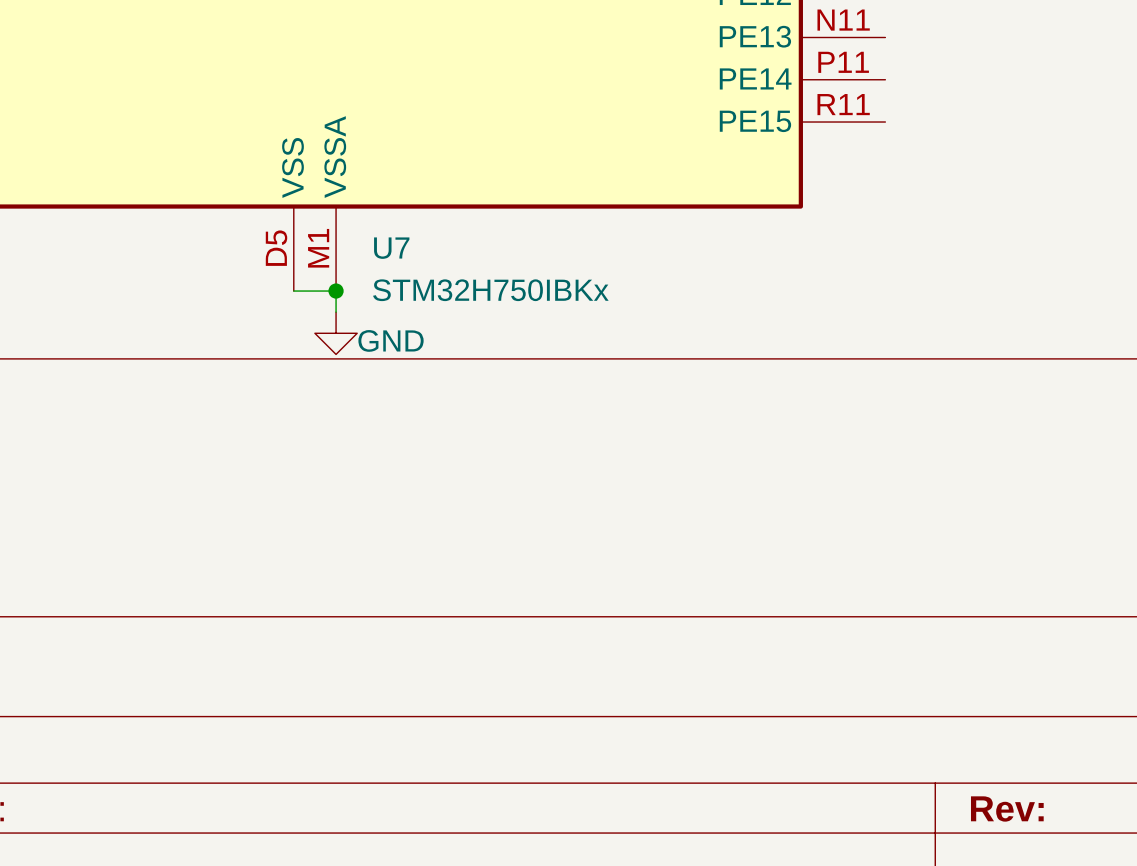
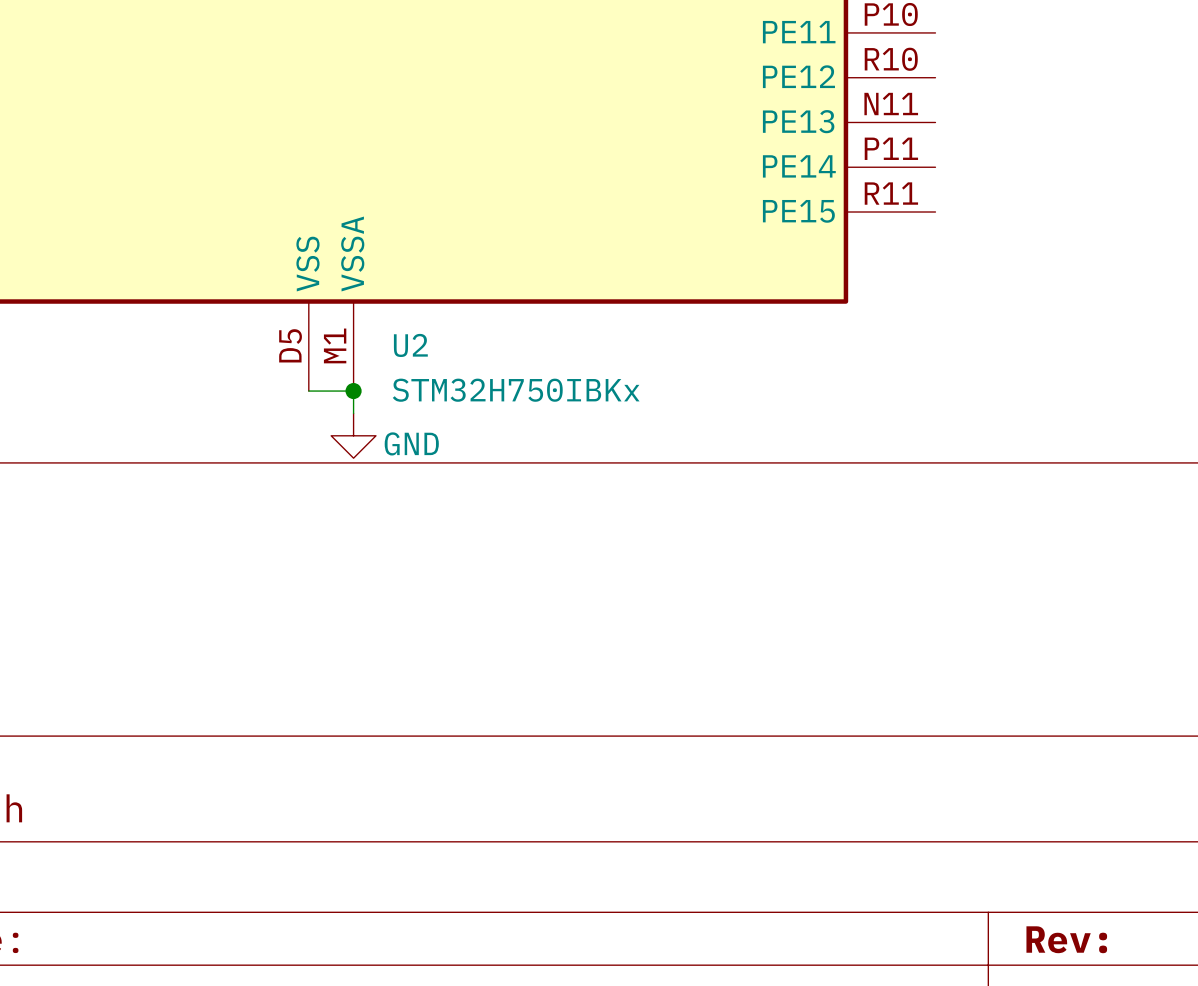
U7 name: U7 (391, 248) -> U2 (410, 345)

